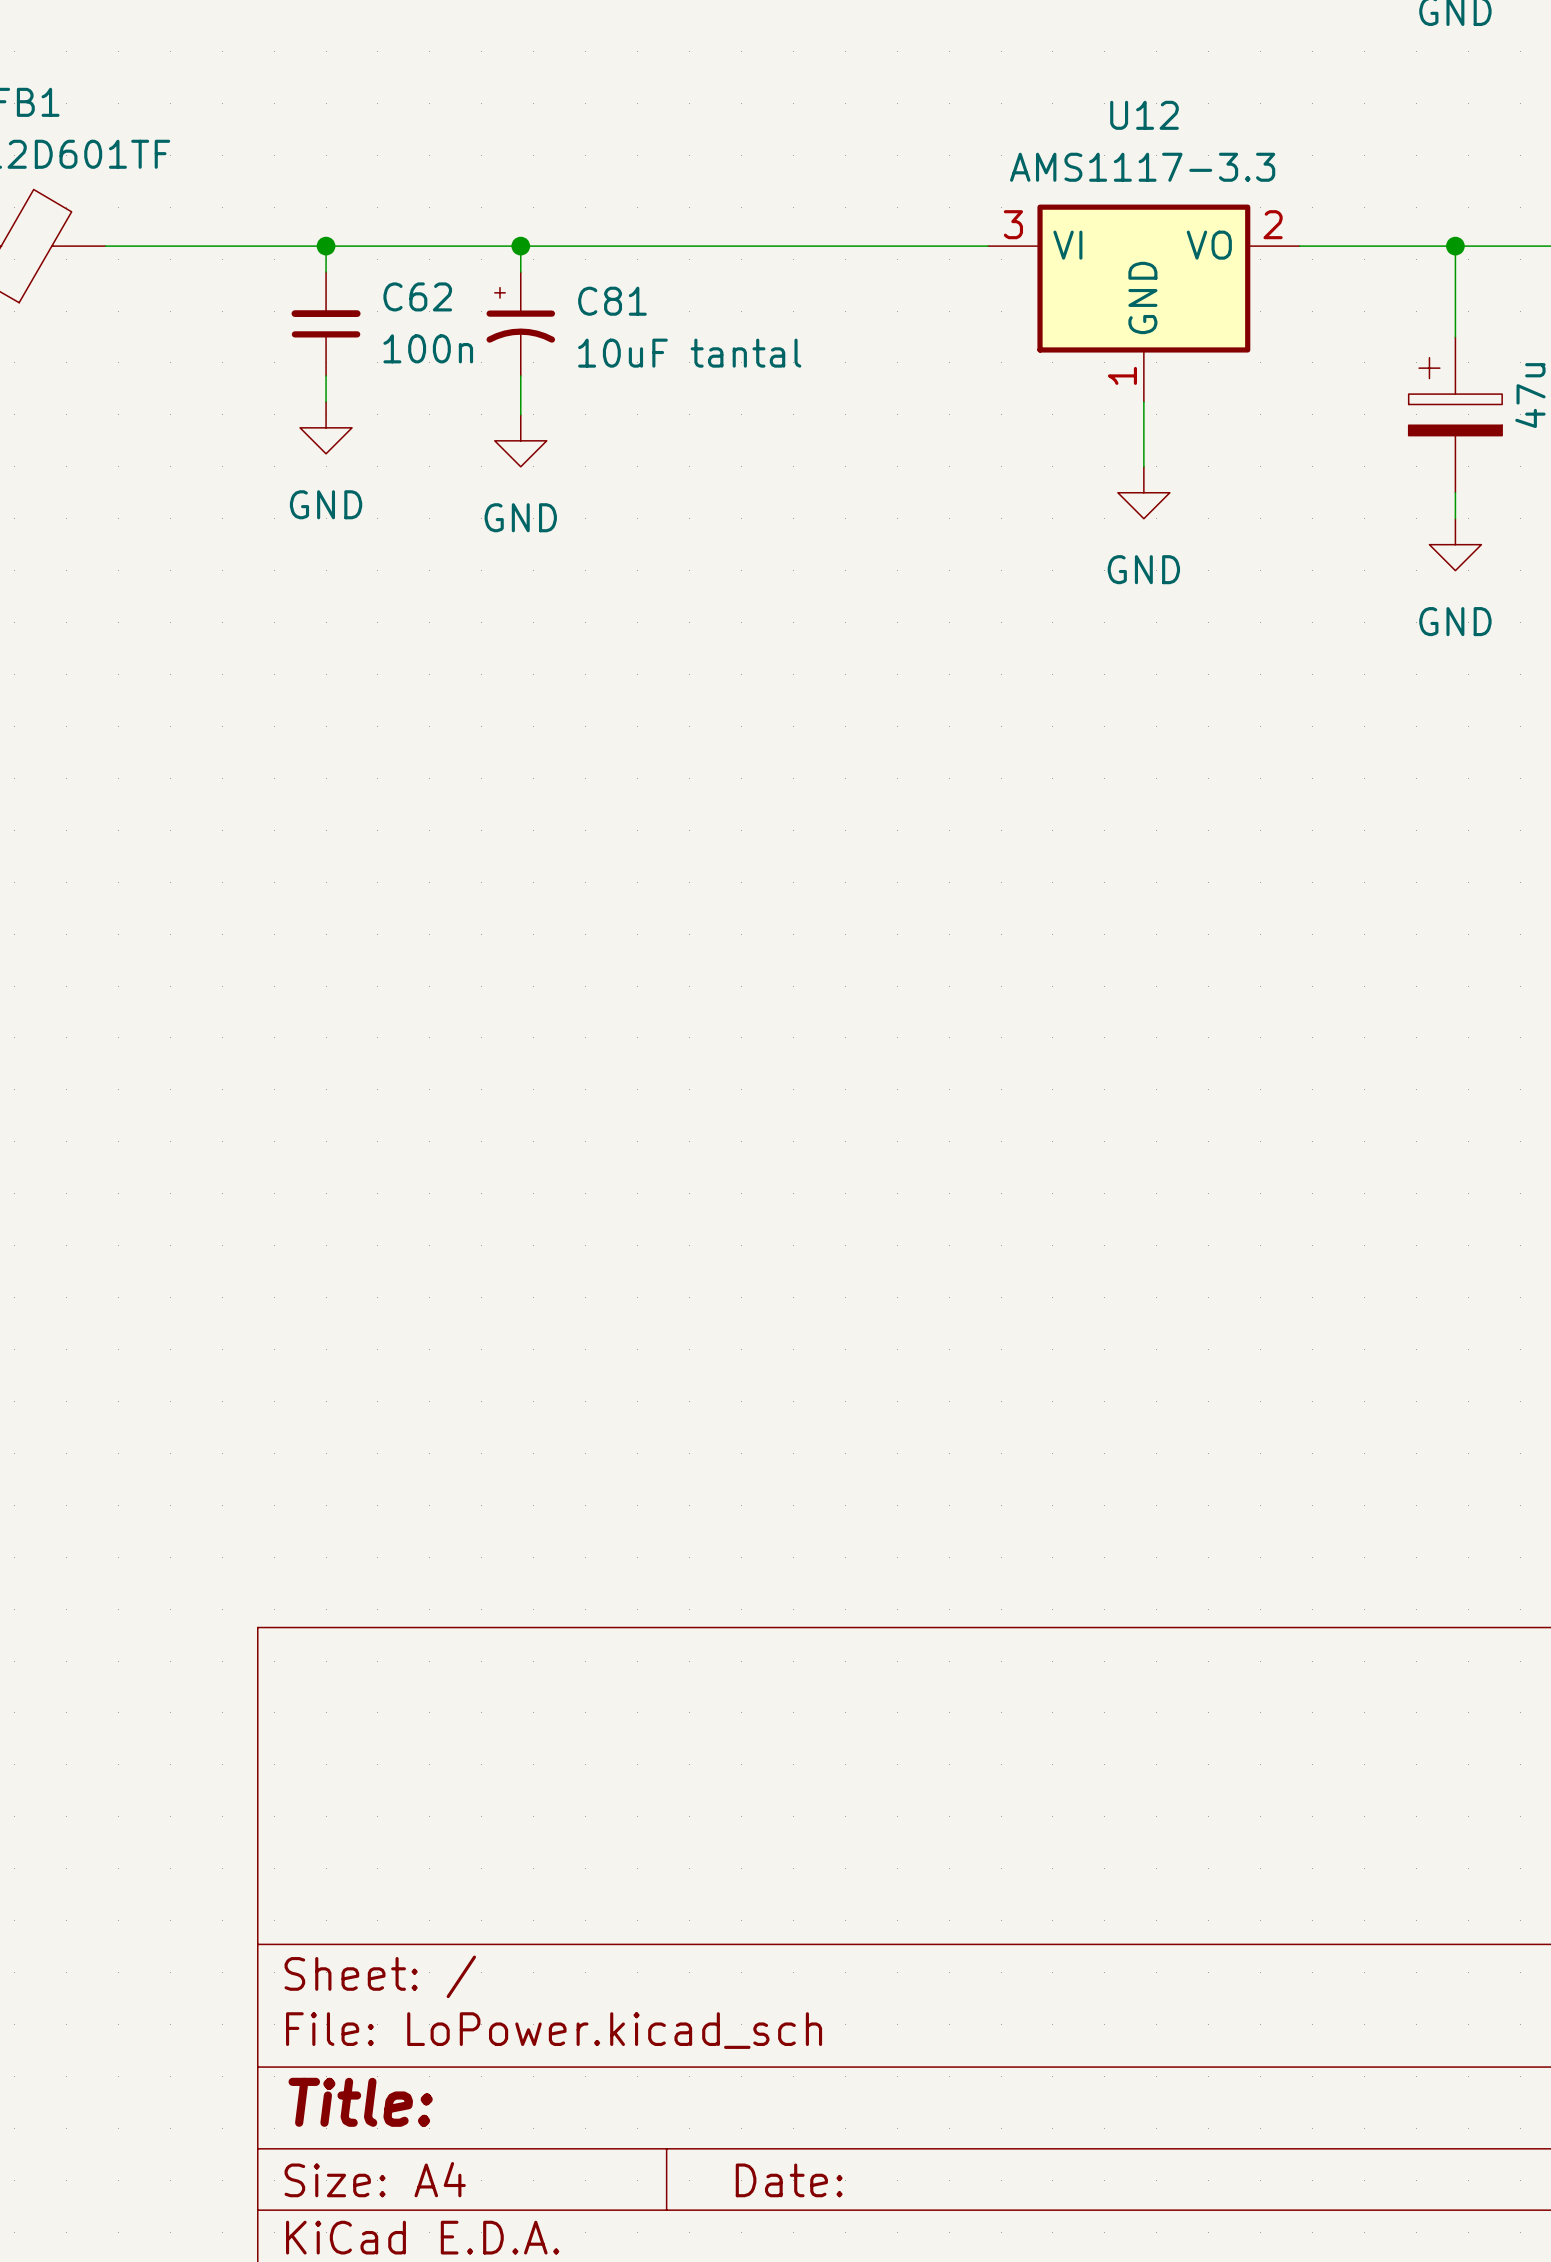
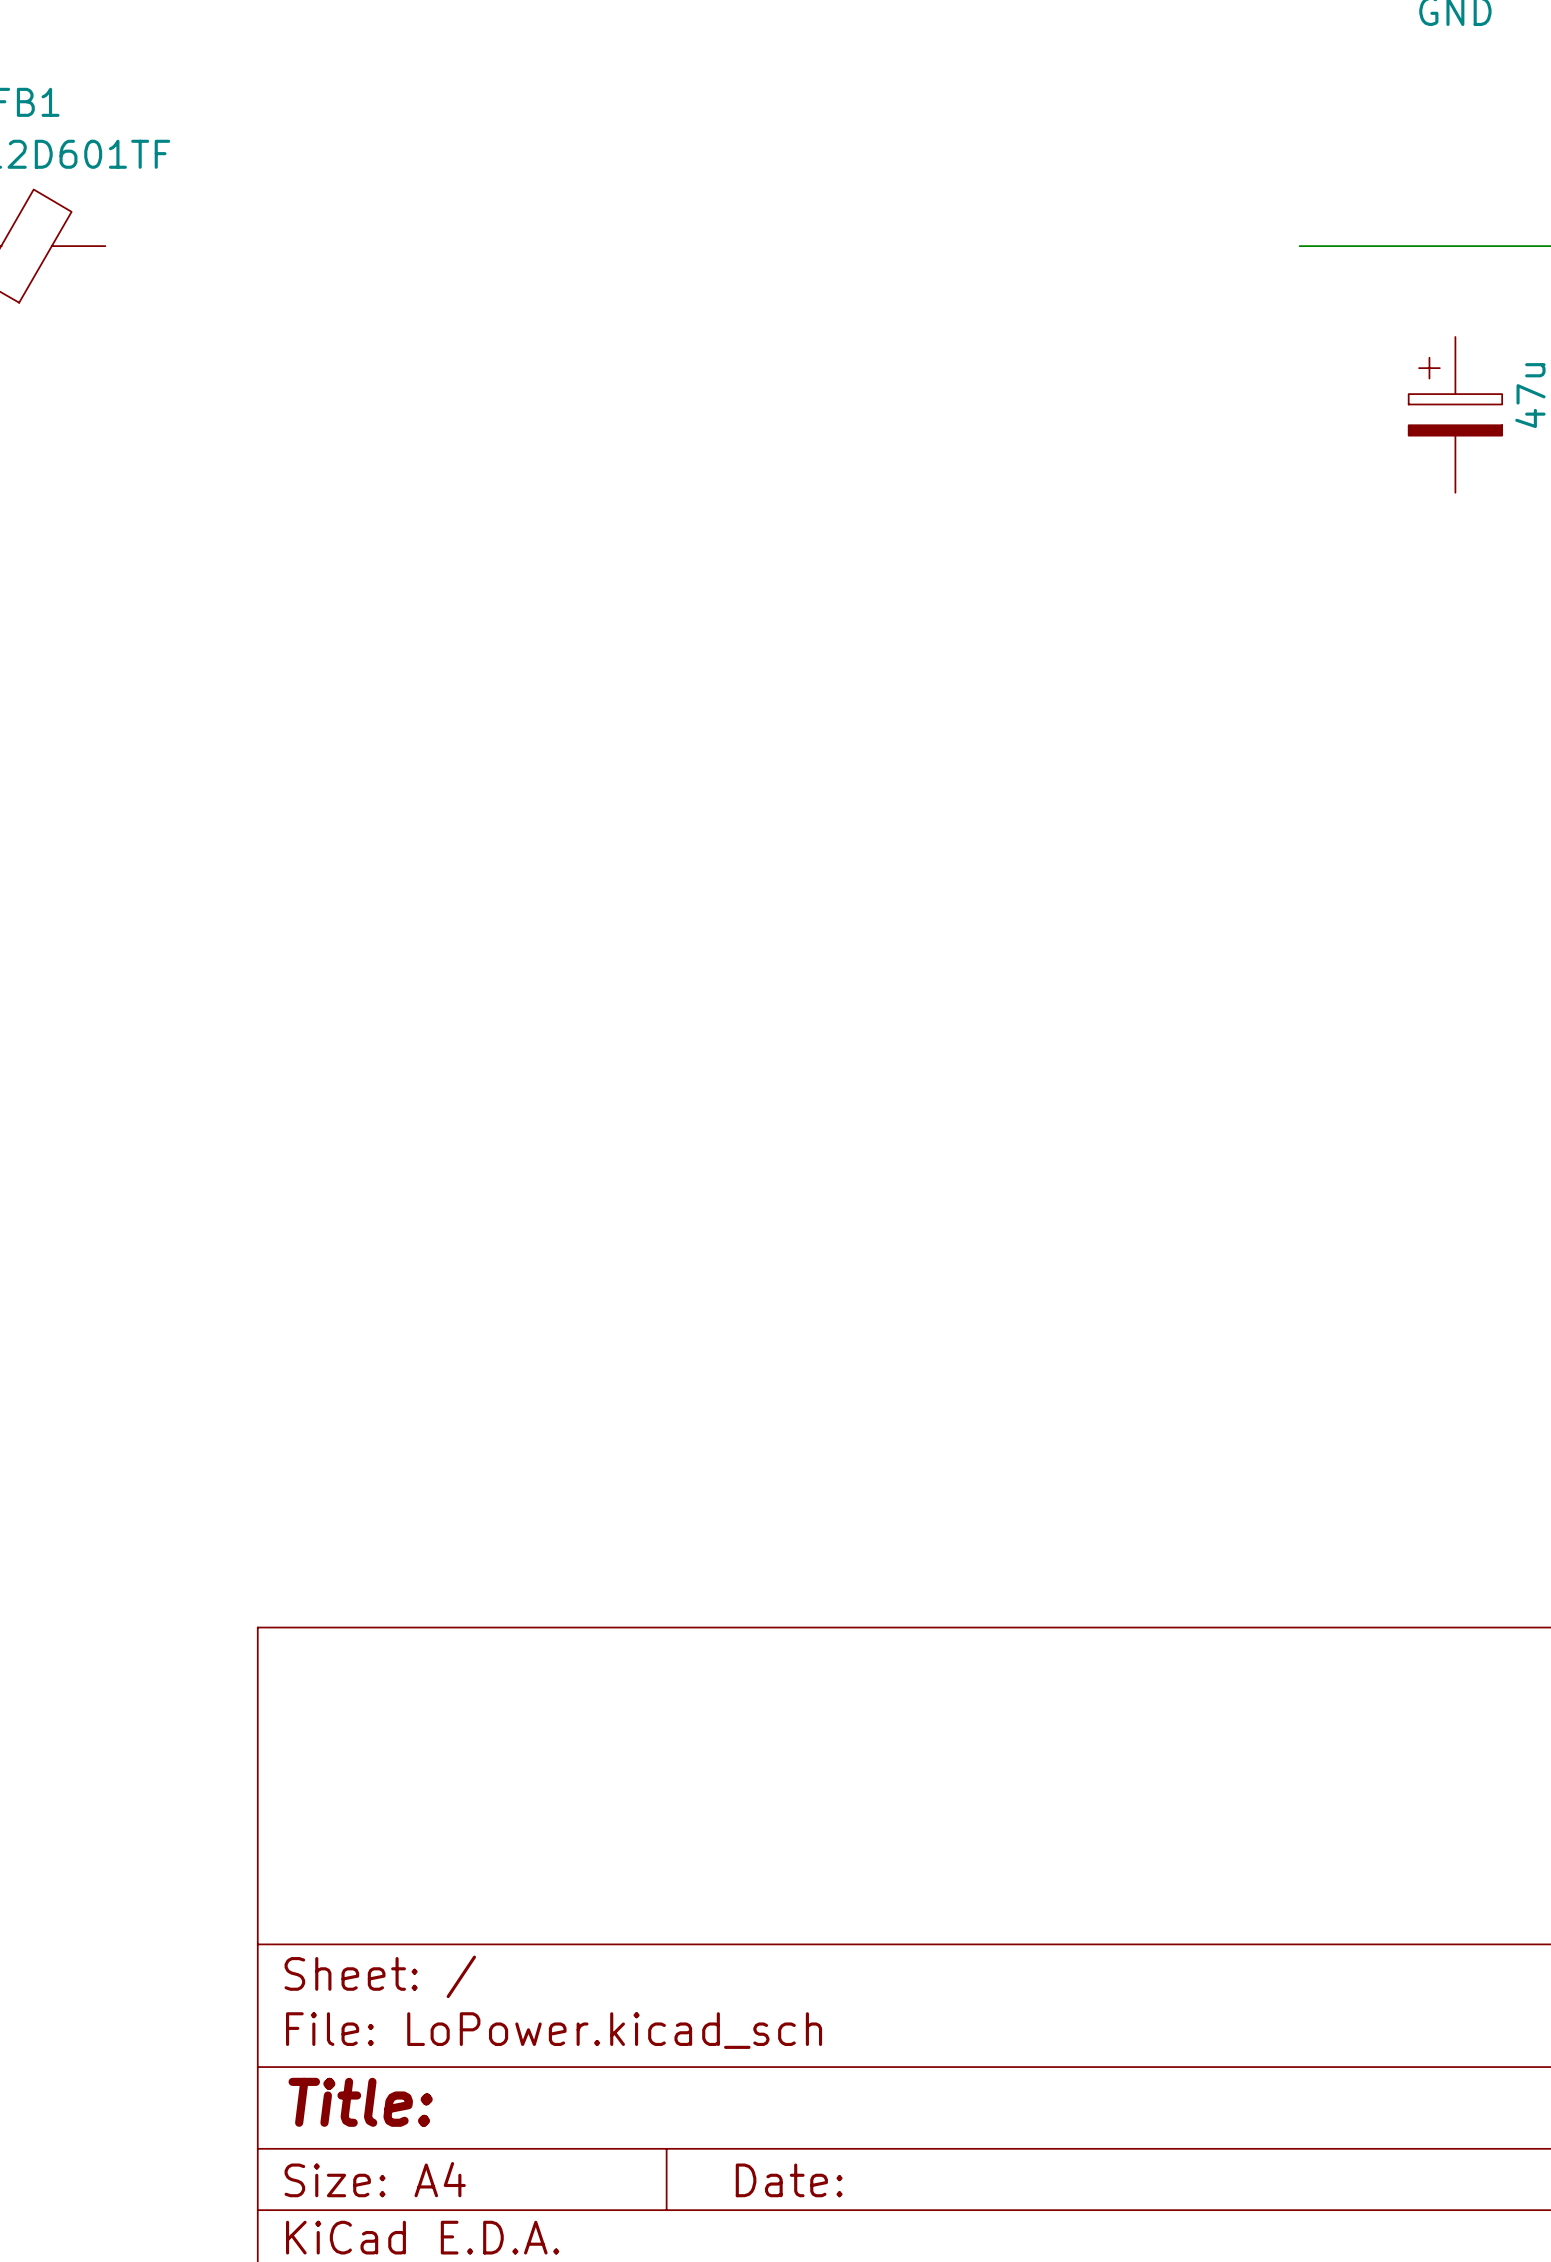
wire: (105, 246) (988, 246) -> none
wire: (326, 246) (326, 272) -> none
junction: (326, 246) -> none
wire: (520, 246) (520, 272) -> none
junction: (520, 246) -> none
wire: (1455, 246) (1455, 336) -> none
junction: (1455, 246) -> none
U12: AMS1117-3.3 (1143, 303) -> none
C62: 100n (326, 323) -> none
C81: 10uF tantal (520, 323) -> none
wire: (326, 375) (326, 401) -> none
wire: (520, 375) (520, 414) -> none
wire: (1143, 401) (1143, 466) -> none
power symbol: GND (326, 427) -> none
power symbol: GND (520, 440) -> none
power symbol: GND (1143, 492) -> none
wire: (1455, 492) (1455, 518) -> none
power symbol: GND (1455, 544) -> none

